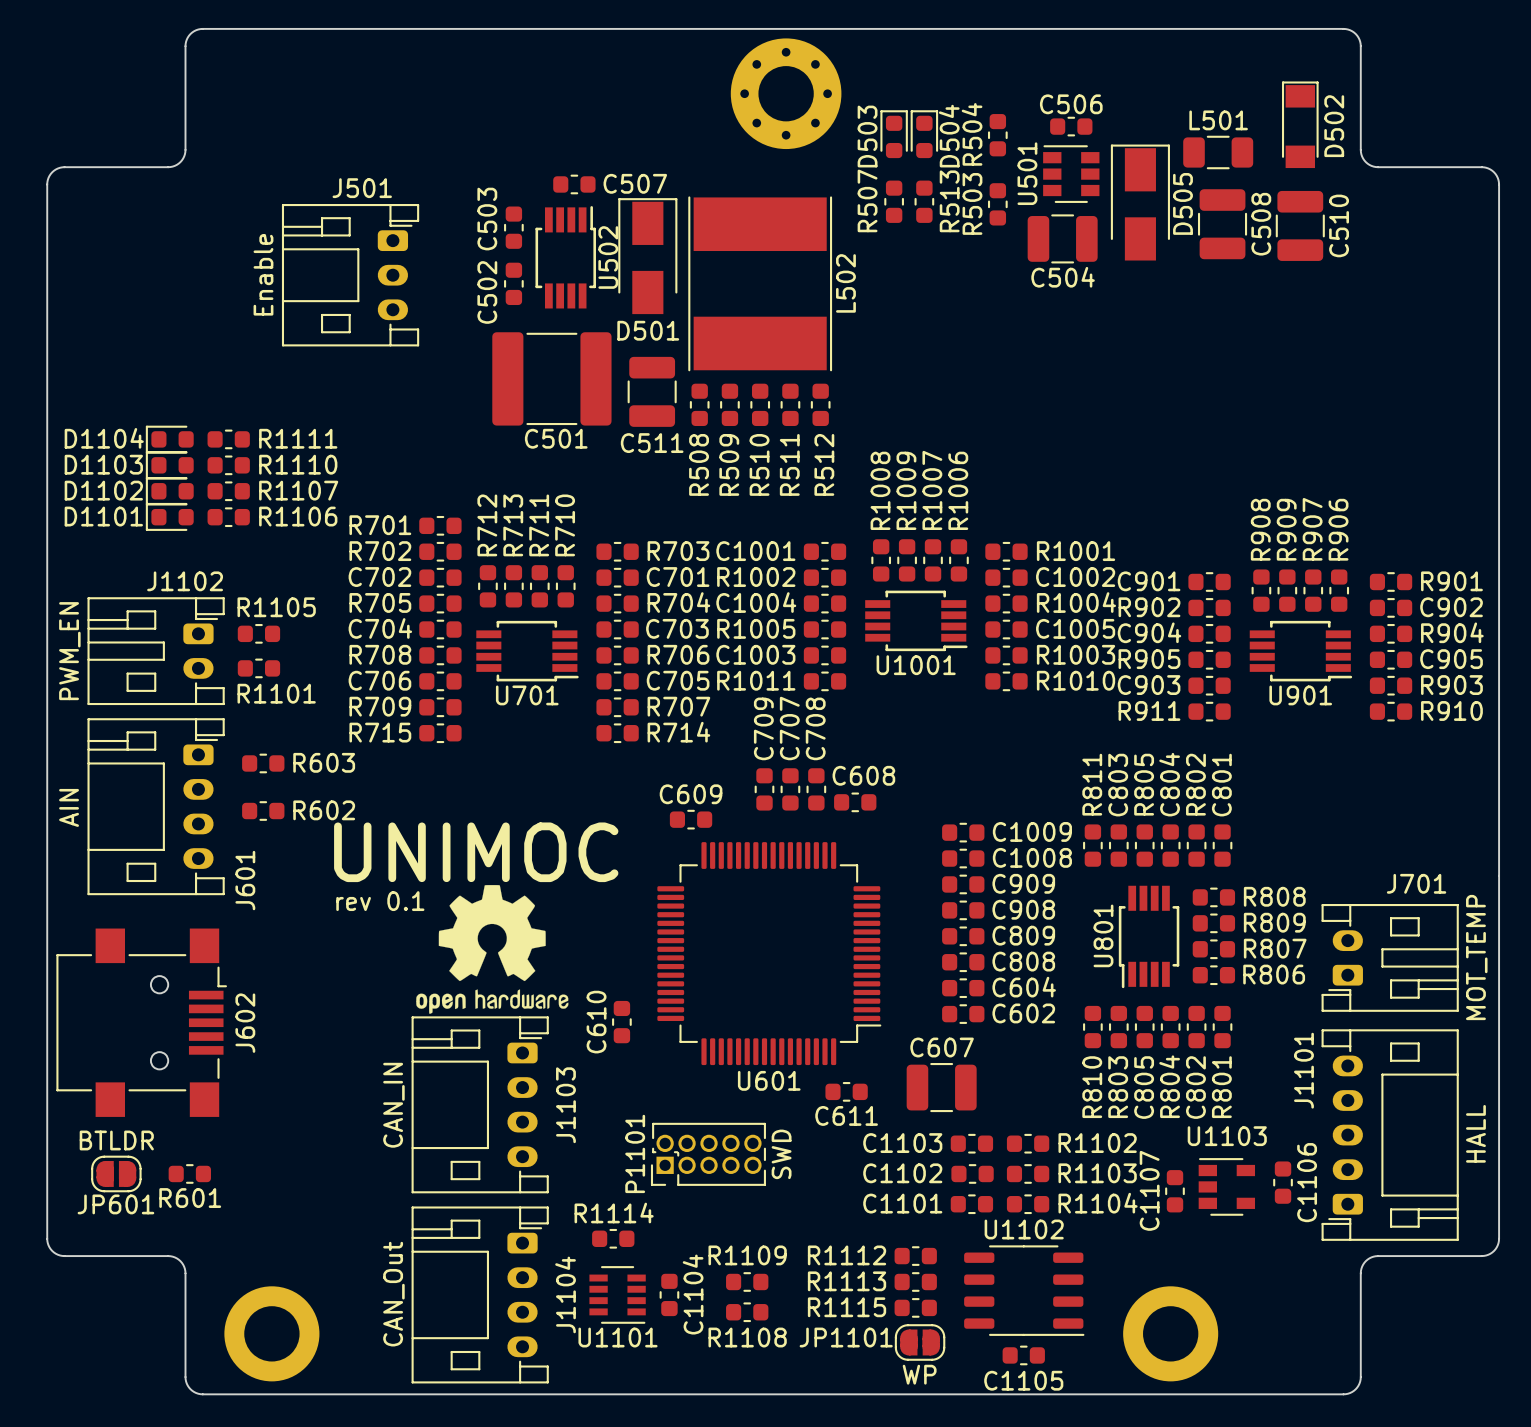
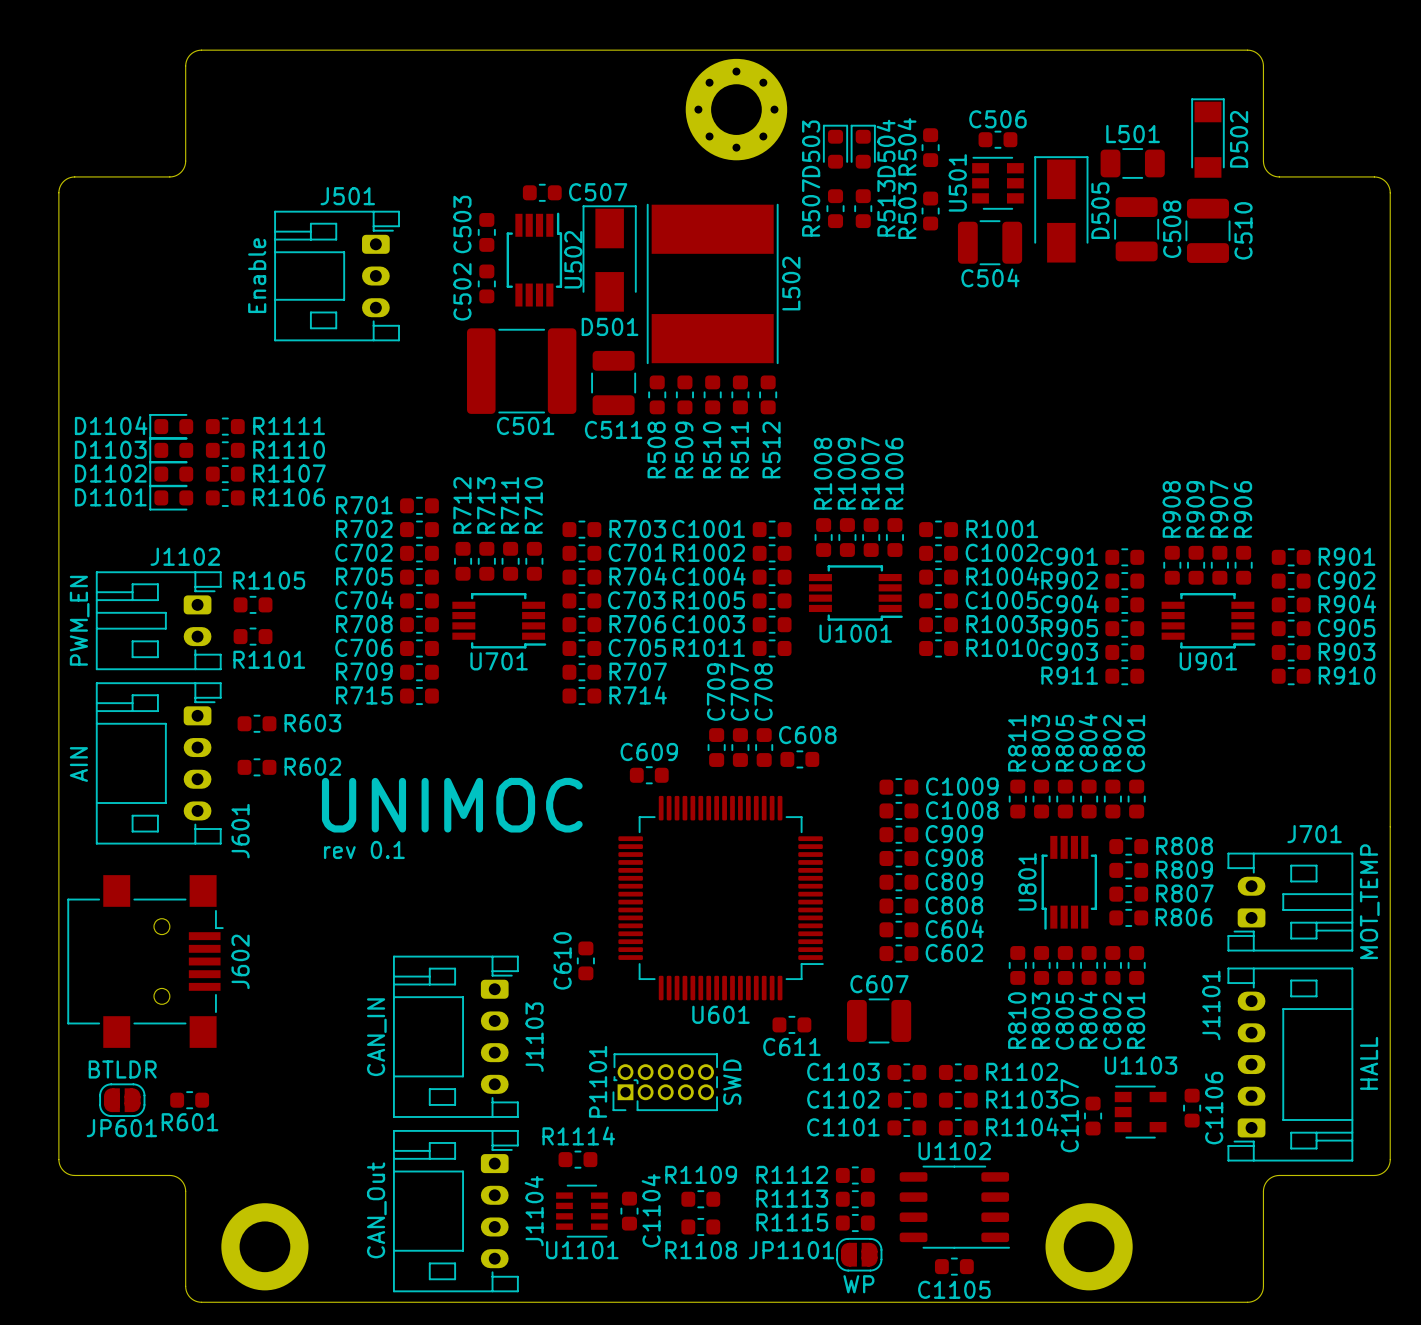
drawing: [416, 885, 569, 1014] -> none

